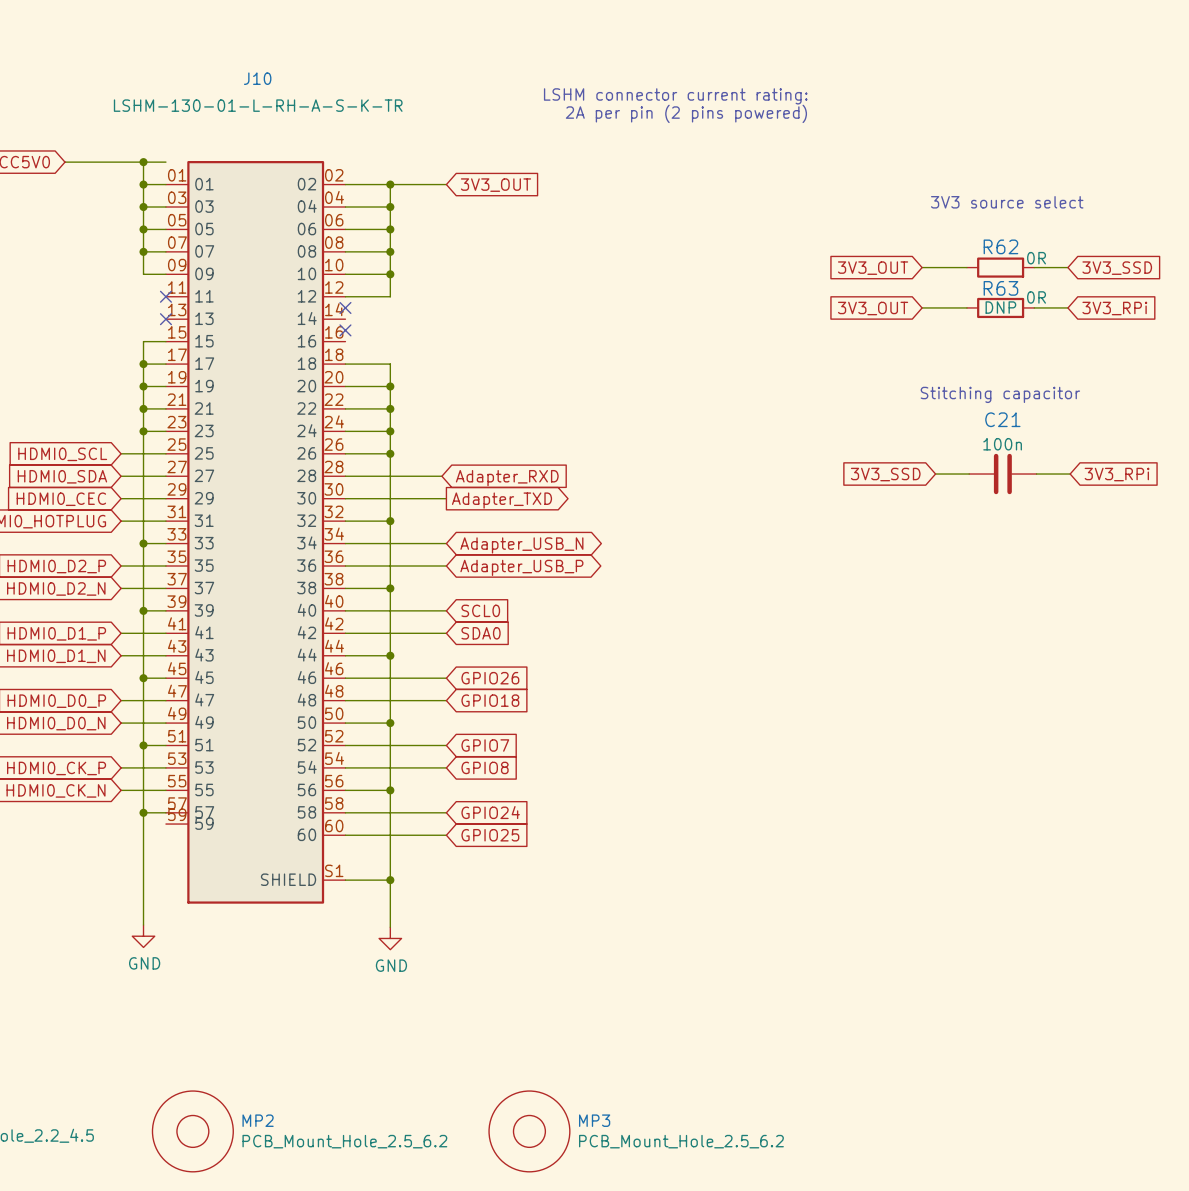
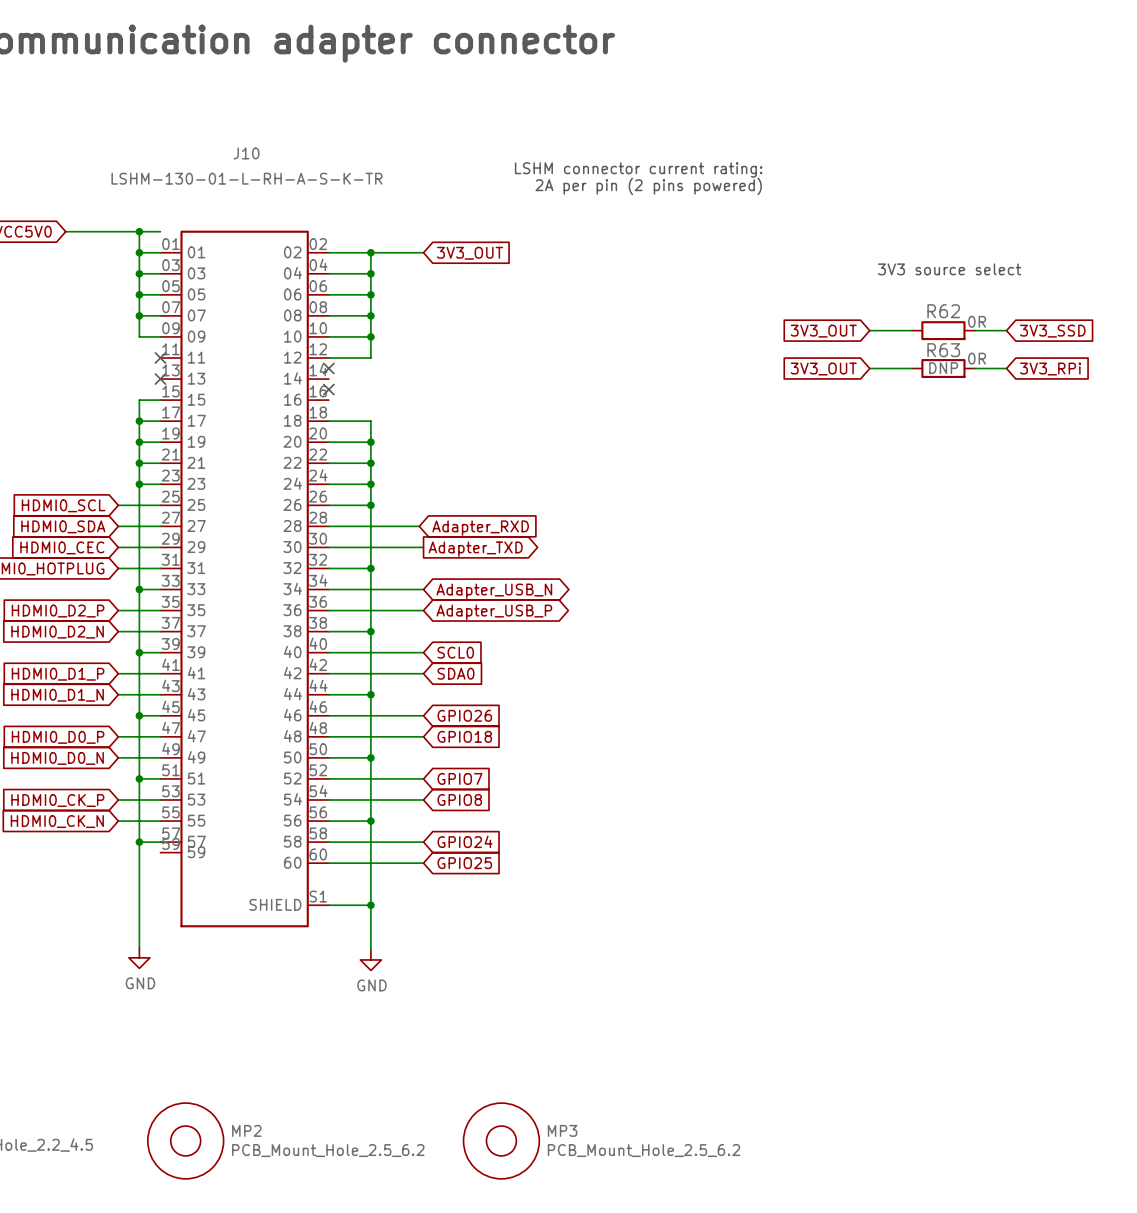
text: Stitching capacitor (1000, 394) -> none
global label: 3V3_SSD (885, 474) -> none
wire: (935, 474) (969, 474) -> none
C21: (1002, 474) -> none
wire: (1036, 474) (1070, 474) -> none
global label: 3V3_RPi (1117, 474) -> none

